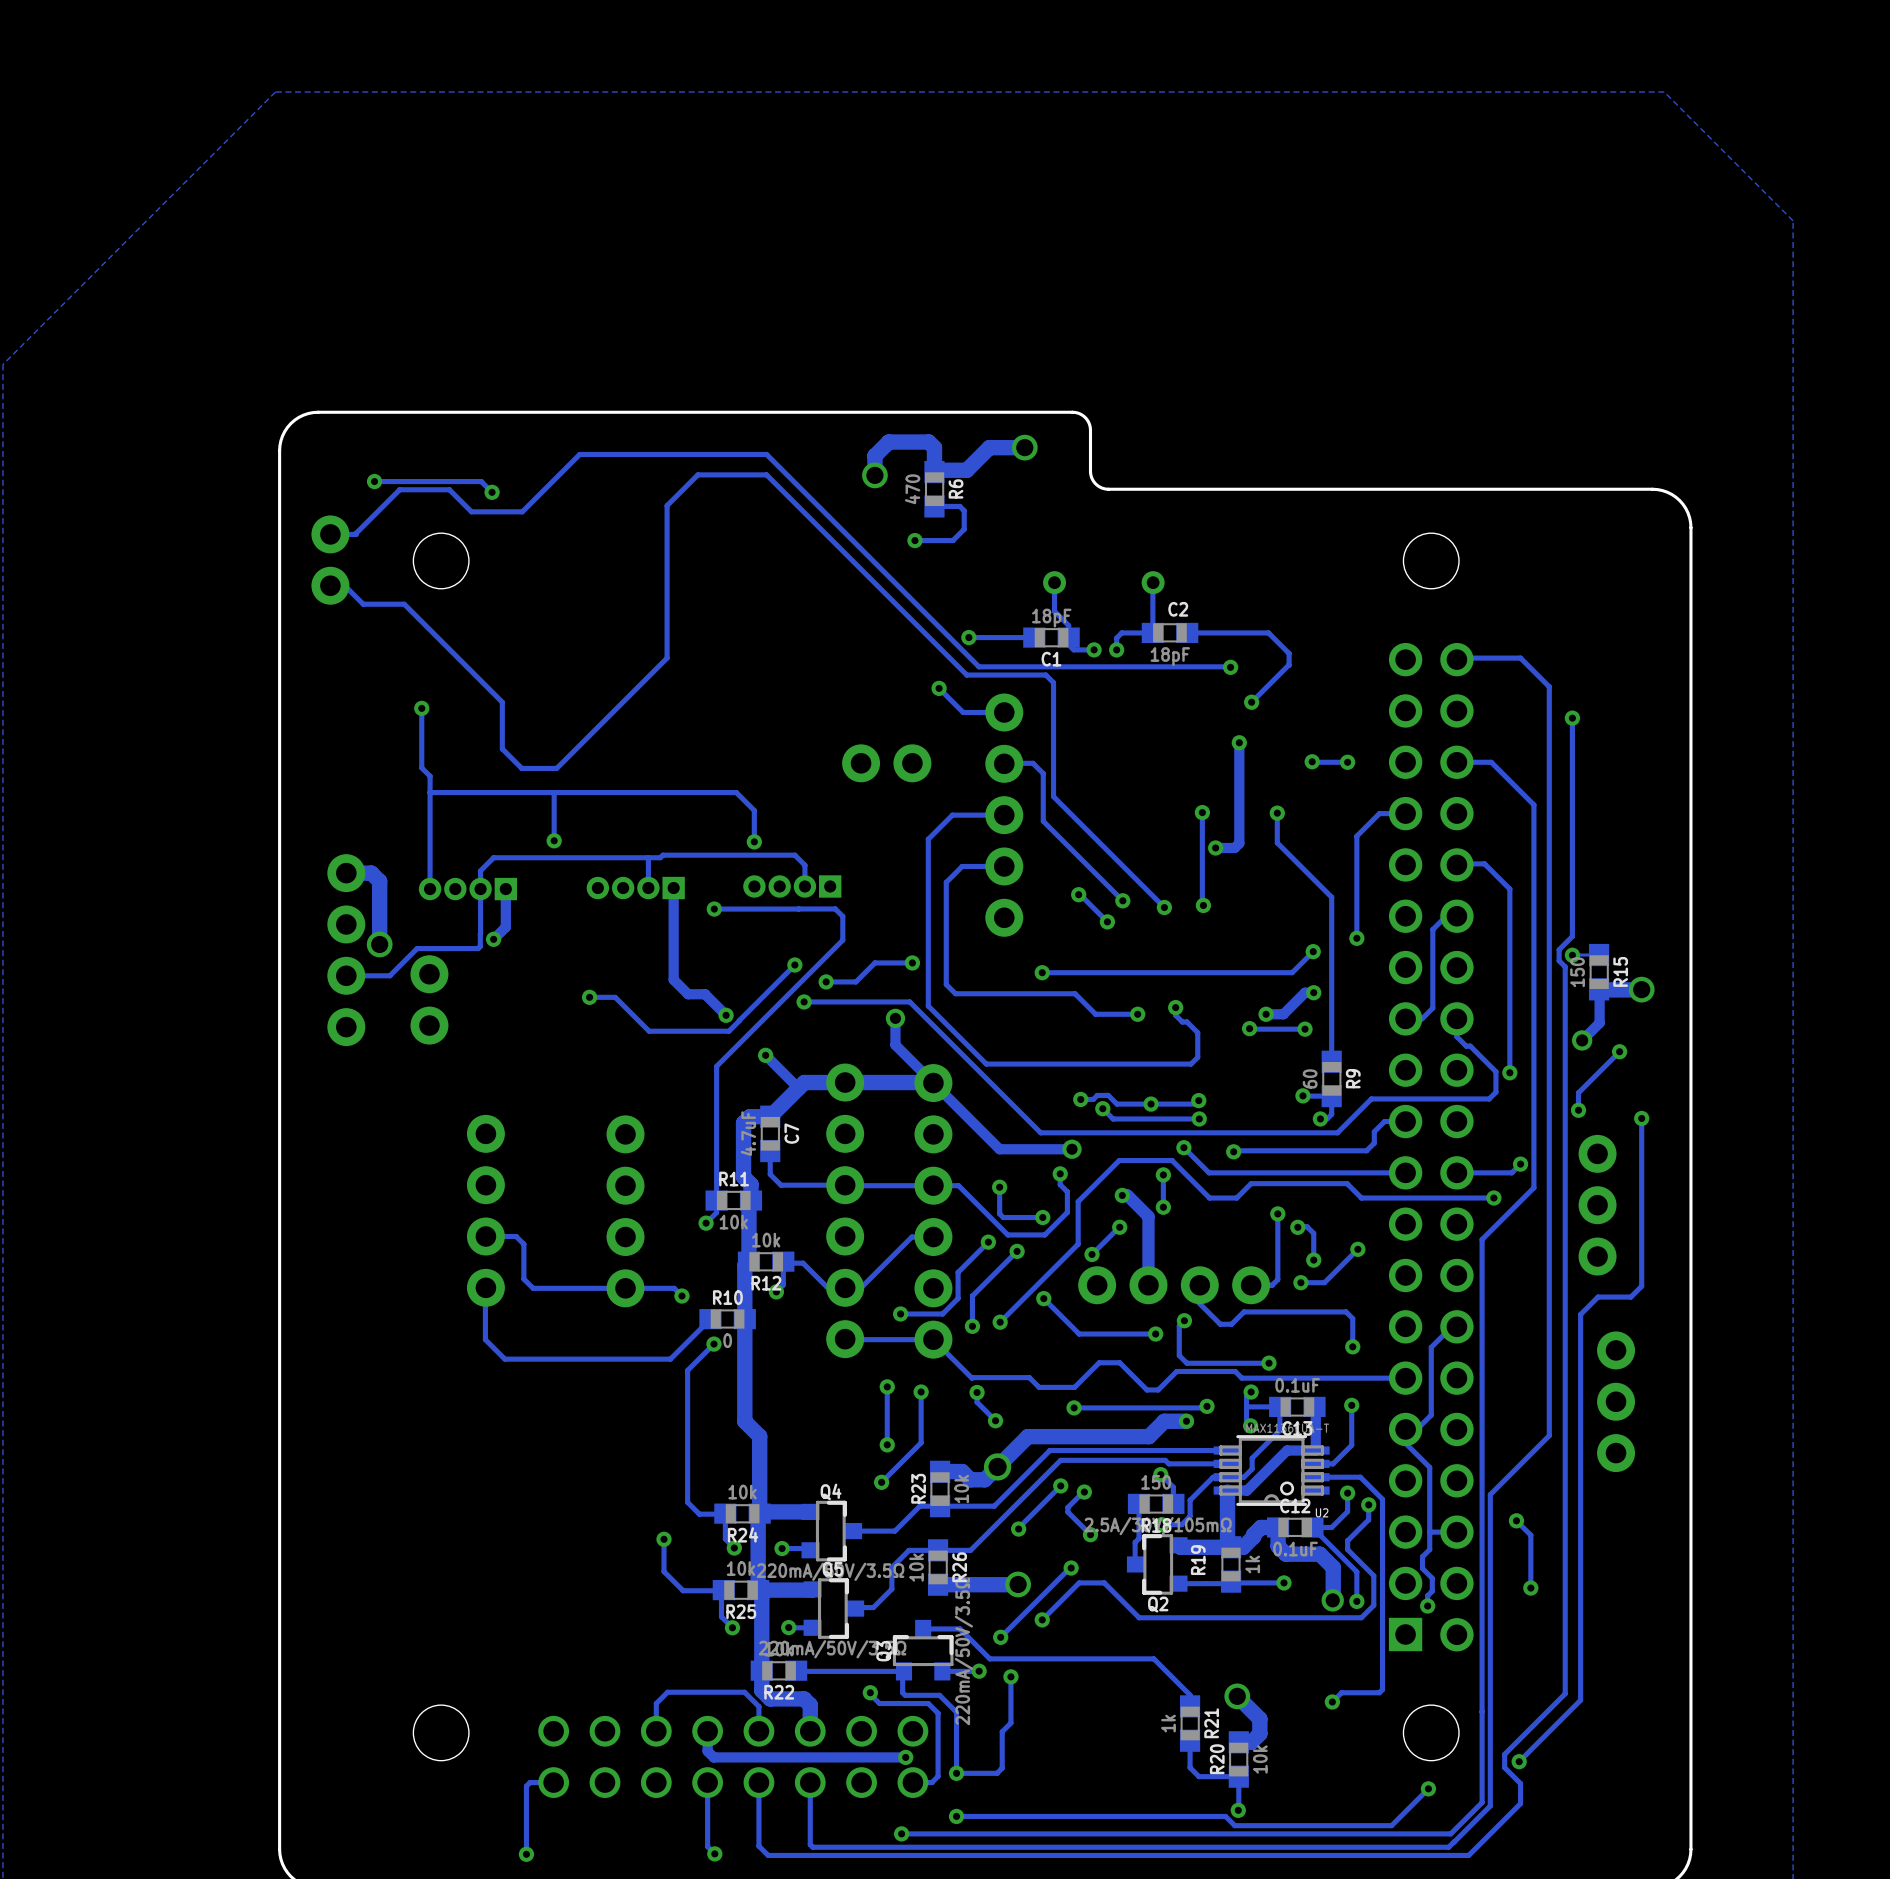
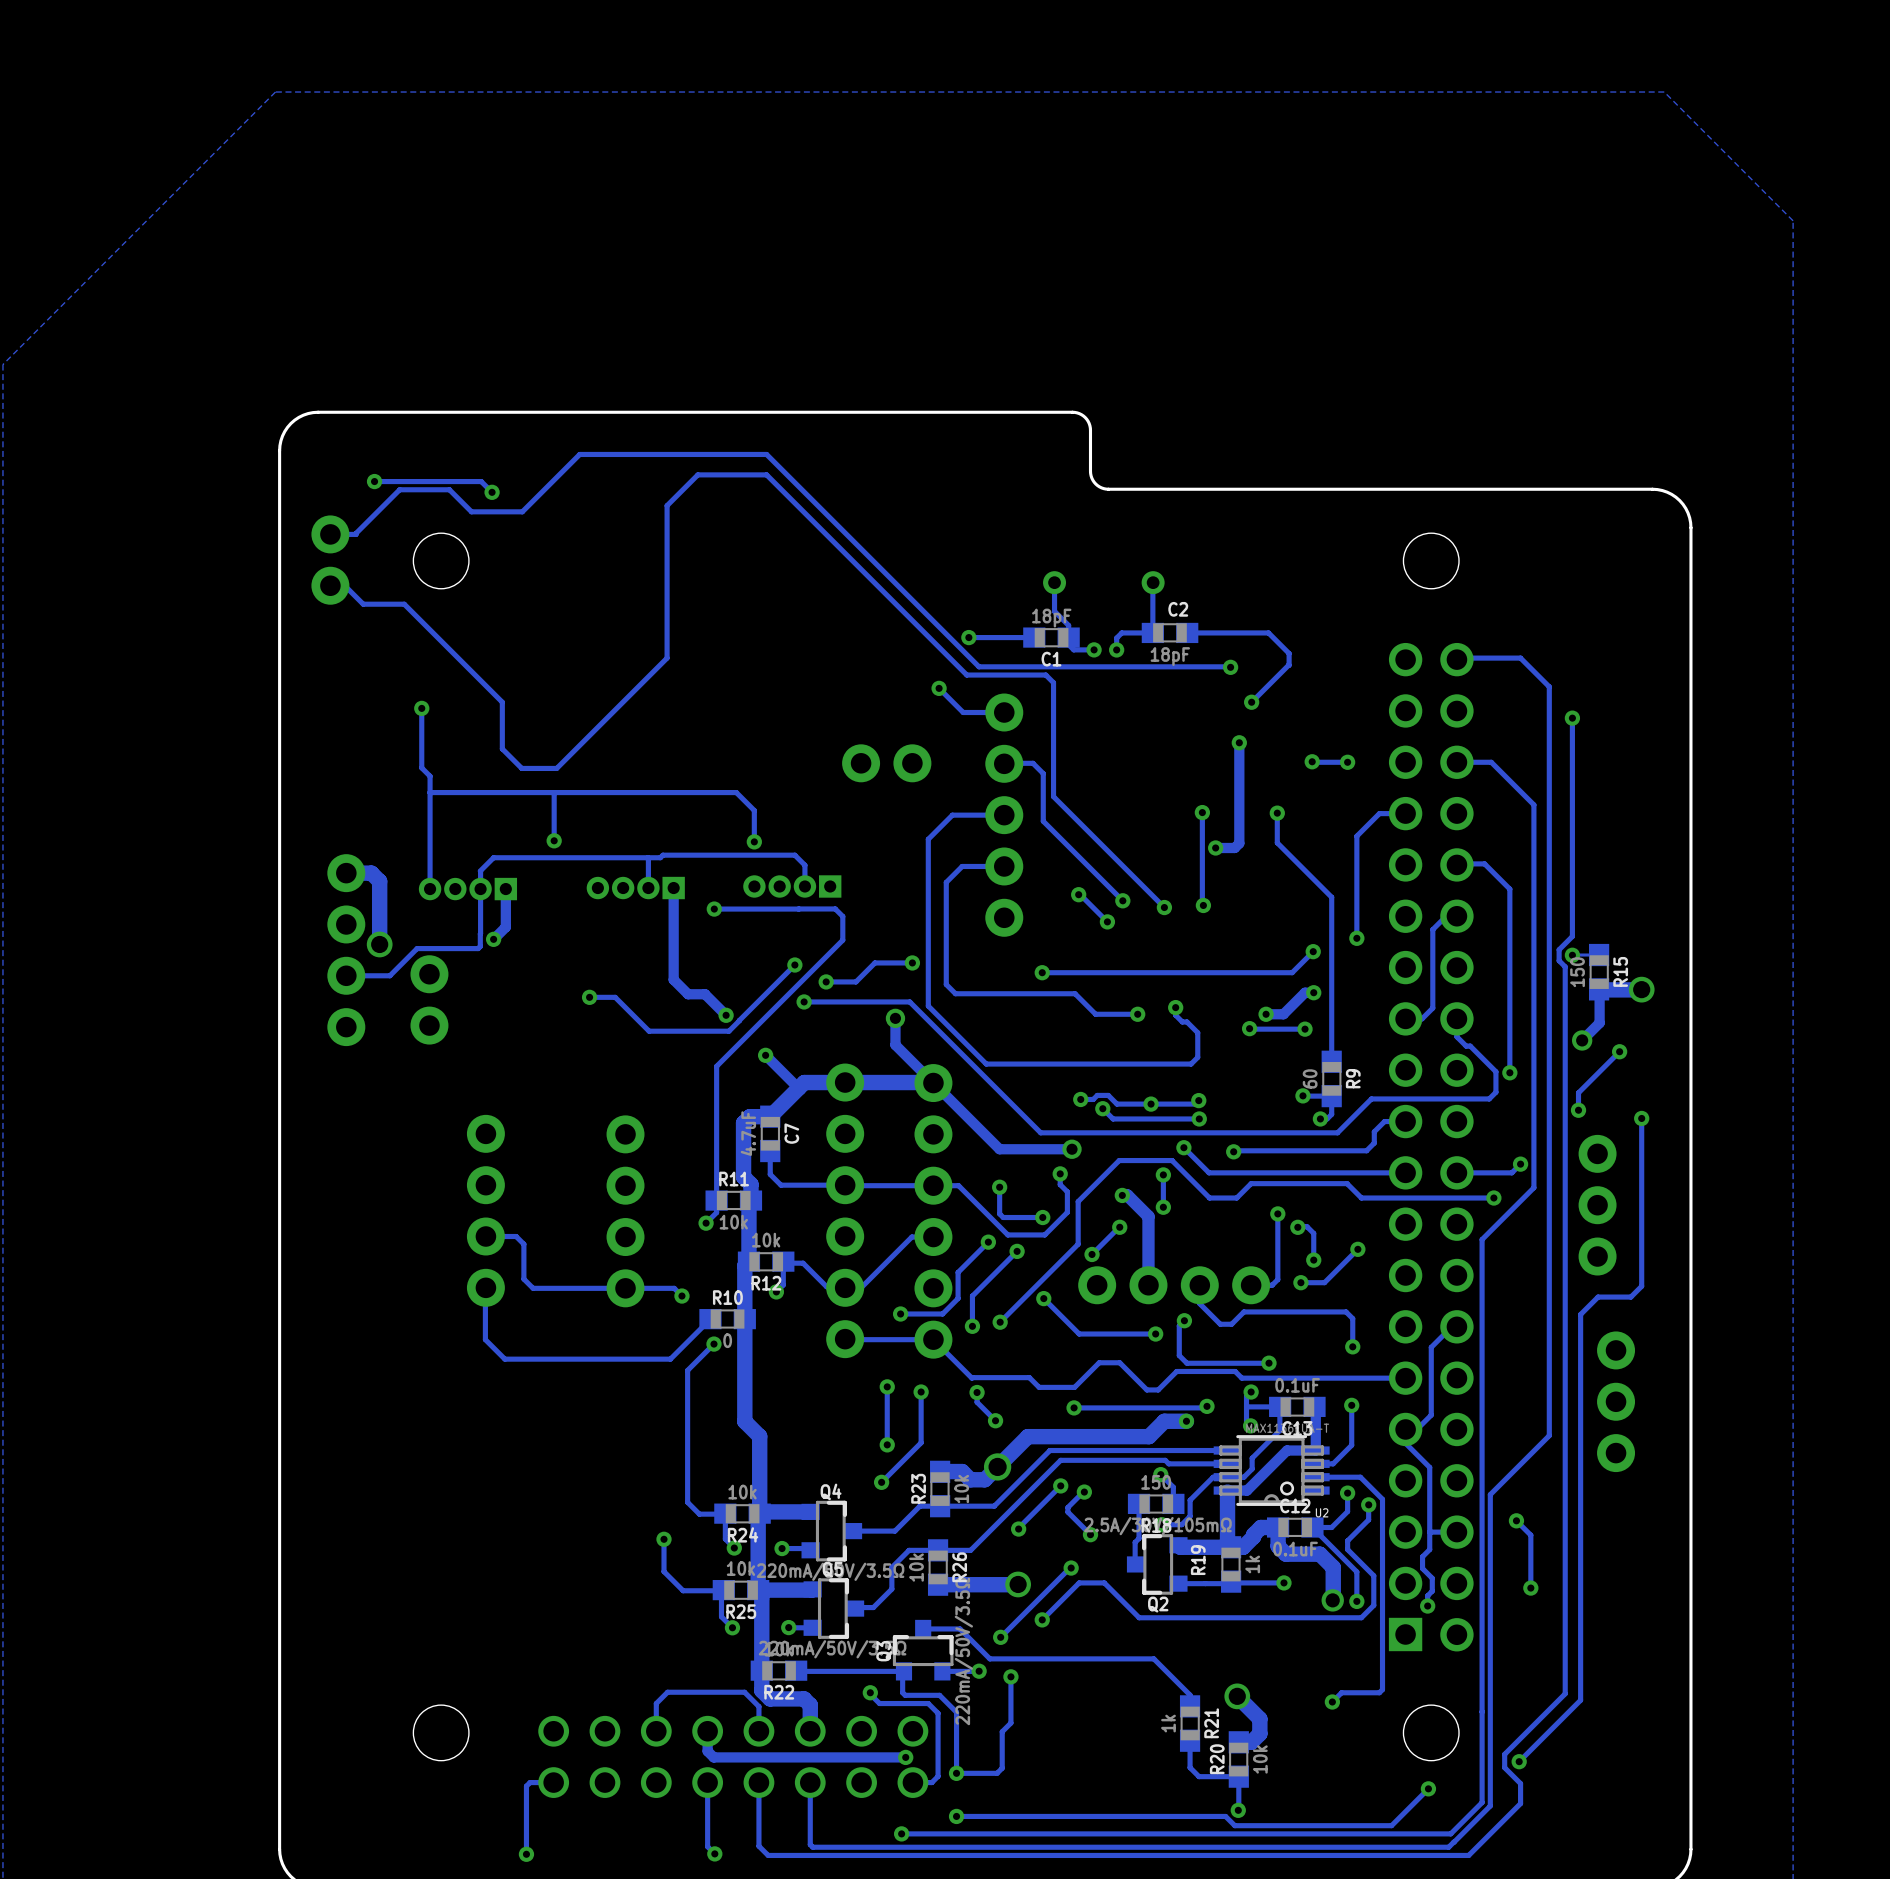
track: (1024, 447) (989, 447) (966, 470) (936, 470) (934, 472) (934, 447) (928, 442) (888, 442) (874, 455) (874, 475) -> none
via: (1024, 447) -> none
via: (874, 475) -> none
R6: 470 (934, 489) -> none
track: (934, 506) (959, 506) (964, 510) (964, 529) (952, 540) (914, 540) -> none
via: (914, 540) -> none

